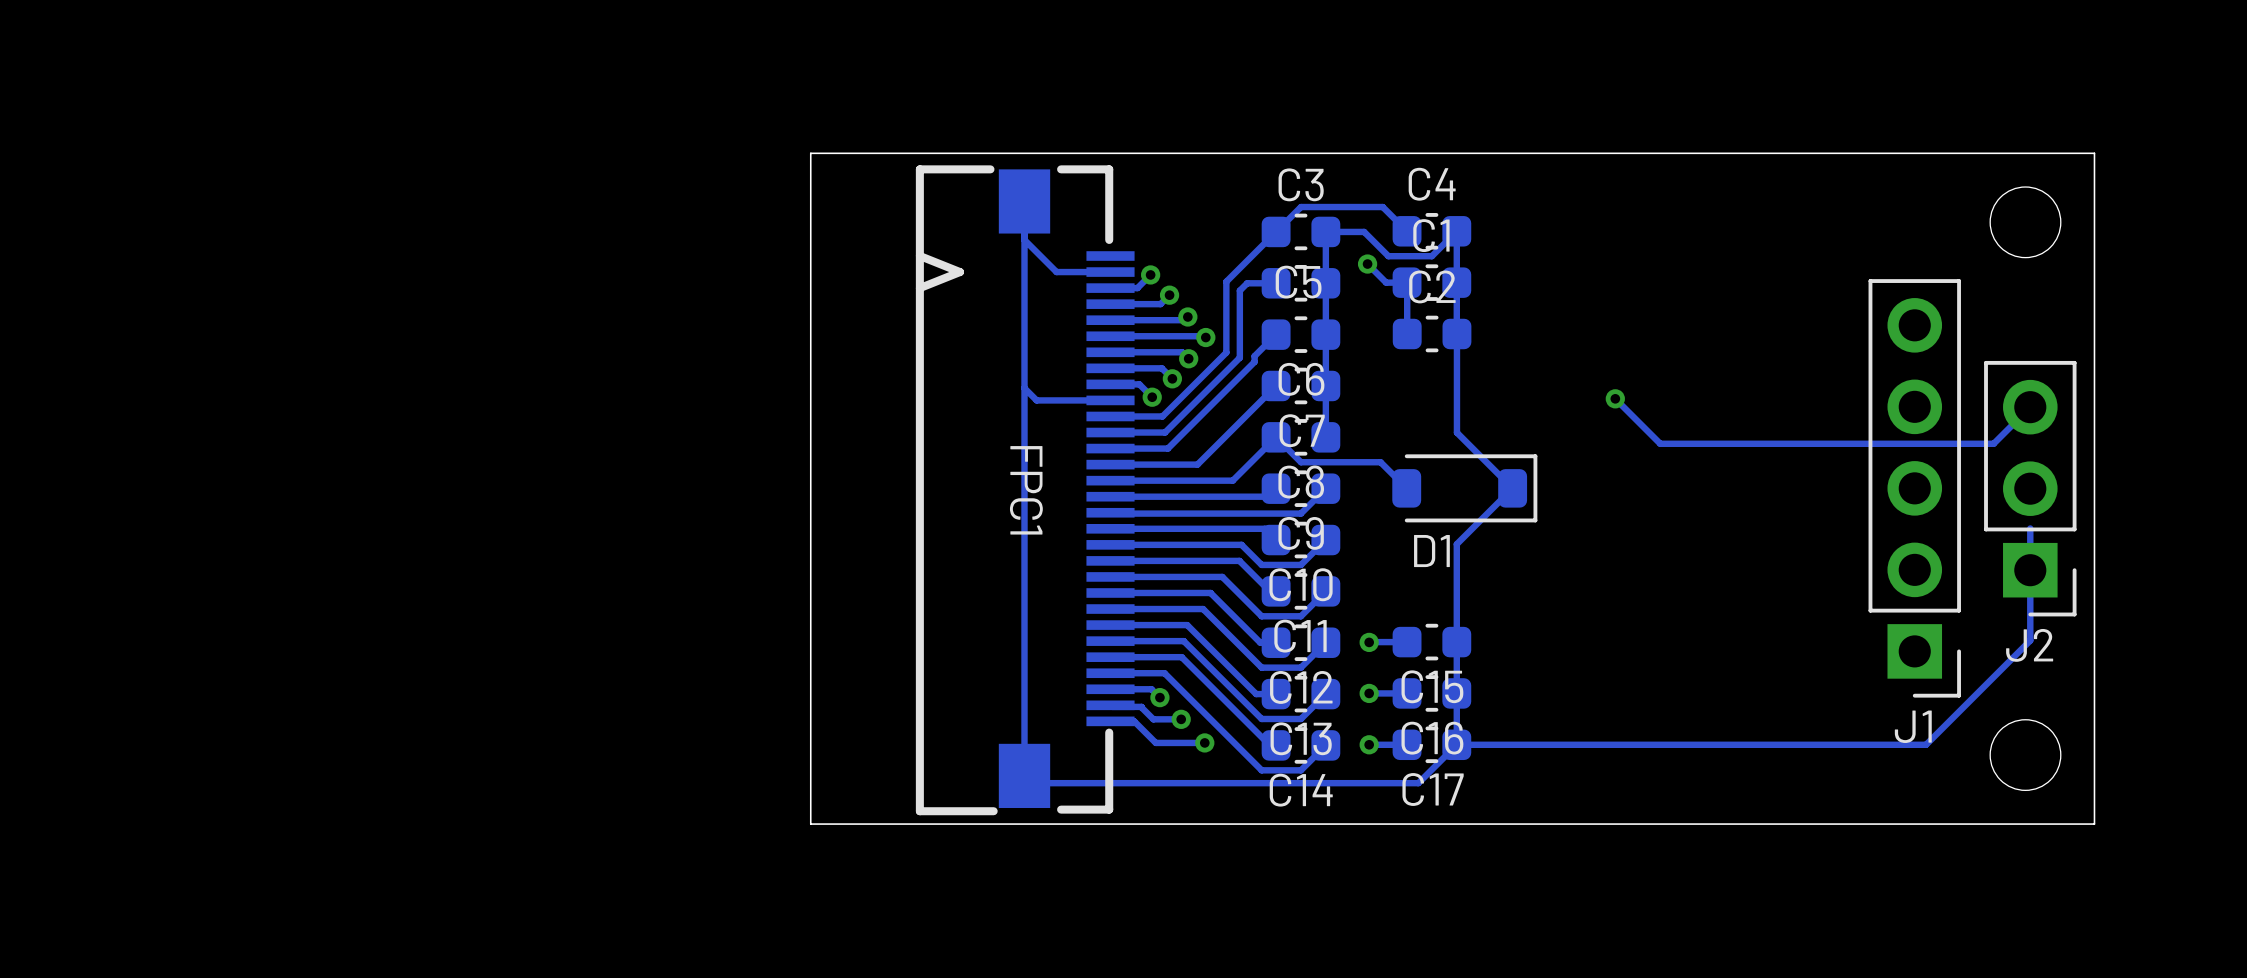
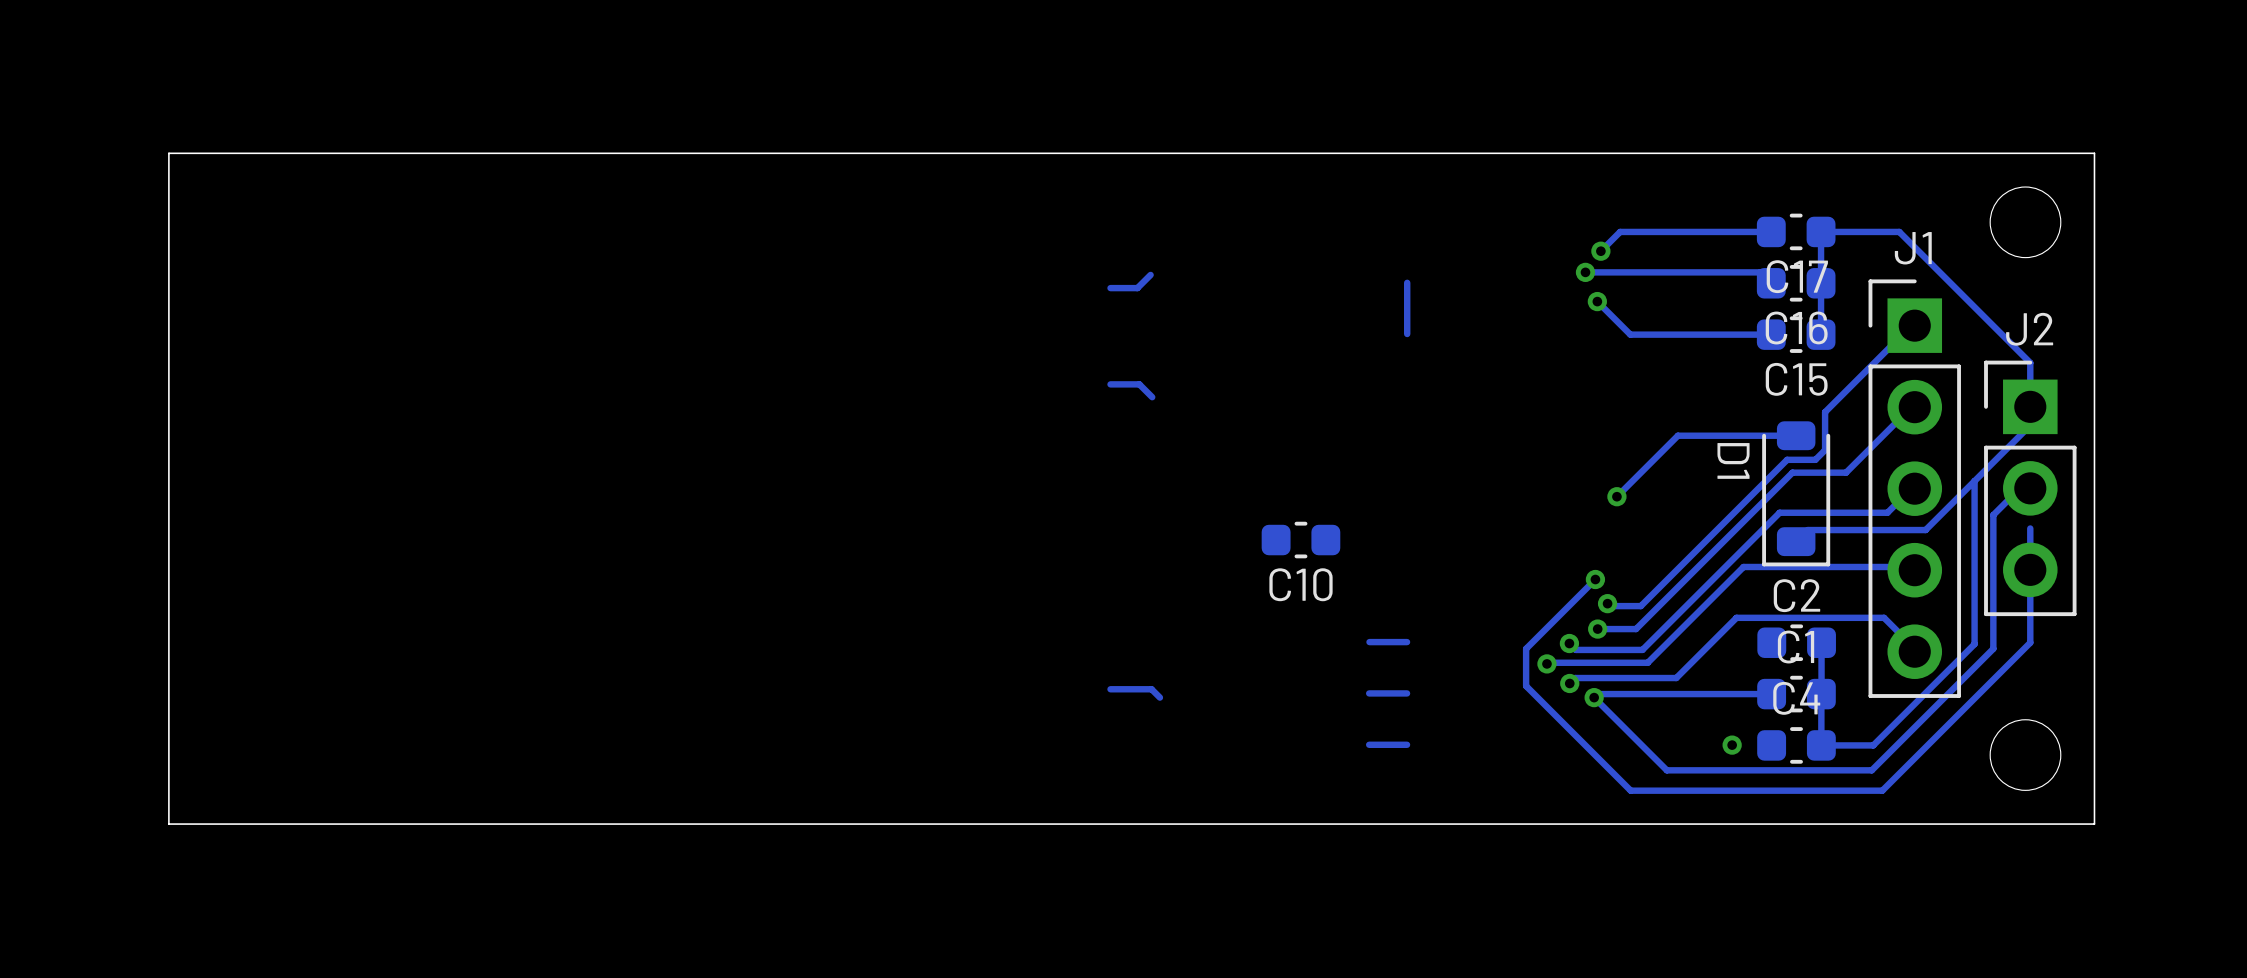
board edge: (810, 153) (810, 824) -> (810, 153) (168, 153) (168, 824) (810, 824)
track: (1024, 201) (1024, 775) (1031, 783) (1418, 783) (1456, 744) -> none
C3: (1300, 231) -> none
track: (1407, 231) (1382, 207) (1301, 207) (1226, 281) (1226, 352) (1162, 416) (1110, 416) -> none
C4 position: (1431, 231) -> (1796, 745)
track: none -> (1771, 231) (1620, 231) (1600, 251)
track: (1024, 239) (1056, 272) (1110, 272) -> none
via: none -> (1600, 251)
track: (1367, 264) (1386, 282) (1407, 282) -> none
via: (1367, 264) -> none
track: none -> (1585, 272) (1760, 272) (1771, 283)
via: none -> (1585, 272)
via: (1150, 274) -> none
C1 position: (1431, 282) -> (1796, 694)
track: (1276, 283) (1247, 283) (1239, 290) (1239, 357) (1165, 432) (1110, 432) -> none
C5: (1300, 283) -> none
track: (1169, 295) (1160, 304) (1110, 304) -> none
via: (1169, 295) -> none
track: none -> (1597, 301) (1630, 334) (1771, 334)
via: none -> (1597, 301)
track: (1187, 316) (1184, 320) (1110, 320) -> none
via: (1187, 316) -> none
track: none -> (1914, 322) (1825, 412) (1825, 450) (1815, 459) (1787, 459) (1640, 606) (1610, 606) (1607, 603)
C2 position: (1432, 333) -> (1796, 642)
track: (1456, 333) (1456, 231) (1431, 256) (1388, 256) (1364, 231) (1325, 231) (1325, 437) -> none
track: (1456, 333) (1456, 432) (1512, 488) (1456, 544) (1456, 744) -> none
track: (1276, 334) (1254, 356) (1254, 361) (1167, 448) (1110, 448) -> none
C6: (1300, 334) -> none
track: (1110, 336) (1205, 337) -> none
via: (1205, 337) -> none
track: none -> (1825, 338) (1821, 334) (1821, 231) (1899, 231) (2030, 362) (2030, 425) (1925, 530) (1807, 530) (1796, 541)
track: (1110, 352) (1182, 352) (1188, 358) -> none
via: (1188, 358) -> none
track: (1110, 368) (1161, 368) (1172, 378) -> none
via: (1172, 378) -> none
track: (1276, 385) (1197, 464) (1110, 464) -> none
C7: (1300, 385) -> none
track: (1024, 388) (1036, 400) (1110, 400) -> none
via: (1152, 397) -> none
track: (1615, 398) (1660, 443) (1993, 443) (2030, 407) -> none
via: (1615, 398) -> none
track: none -> (1914, 403) (1846, 472) (1792, 472) (1636, 629) (1597, 629)
track: none -> (1796, 435) (1677, 435) (1616, 496)
C8: (1300, 437) -> none
track: none -> (2030, 478) (1993, 515) (1993, 648) (1871, 770) (1666, 770) (1594, 697) (1597, 694) (1771, 694) (1771, 695)
track: (1110, 480) (1232, 480) (1276, 437) (1301, 462) (1380, 462) (1406, 488) -> none
track: none -> (1974, 481) (1974, 644) (1873, 745) (1821, 745) (1820, 642)
track: none -> (1914, 485) (1887, 512) (1779, 512) (1642, 649) (1575, 649) (1569, 643)
track: (1276, 488) (1268, 496) (1110, 496) -> none
C9: (1300, 488) -> none
track: (1325, 488) (1300, 513) (1110, 512) -> none
D1 rotation: 0° (1464, 488) -> 90° clockwise (1796, 493)
D1 position: (1464, 488) -> (1796, 493)
J1 rotation: 0° (1914, 488) -> 180° (1914, 488)
J2 rotation: 0° (2030, 488) -> 180° (2030, 488)
FPC1: (1025, 490) -> none
via: none -> (1616, 496)
track: (1110, 528) (1264, 528) (1276, 540) -> none
track: (1325, 540) (1300, 564) (1261, 564) (1241, 544) (1110, 544) -> none
track: (1110, 560) (1239, 560) (1269, 591) (1276, 591) -> none
track: none -> (1914, 566) (1743, 566) (1647, 662) (1546, 663)
track: (1110, 576) (1222, 576) (1261, 616) (1300, 616) (1325, 591) -> none
via: none -> (1595, 579)
C11: (1300, 591) -> none
track: (1110, 592) (1210, 592) (1260, 642) (1276, 642) -> none
via: none -> (1607, 603)
track: (1110, 609) (1203, 609) (1261, 667) (1300, 667) (1325, 642) -> none
track: (1110, 625) (1187, 625) (1256, 694) (1276, 694) -> none
via: none -> (1597, 629)
track: (2030, 640) (1926, 744) (1456, 744) -> (2030, 640) (2030, 642) (1882, 790) (1630, 790) (1526, 686) (1526, 648) (1595, 579)
track: (1110, 641) (1183, 641) (1261, 718) (1300, 718) (1325, 694) -> none
C12: (1300, 642) -> none
via: (1369, 642) -> none
C15 position: (1431, 642) -> (1796, 334)
via: none -> (1569, 643)
track: none -> (1914, 648) (1884, 617) (1736, 617) (1676, 678) (1575, 678) (1569, 683)
track: (1110, 657) (1181, 657) (1269, 745) (1276, 745) -> none
via: none -> (1546, 663)
track: (1110, 673) (1164, 673) (1261, 770) (1300, 770) (1325, 745) -> none
via: none -> (1569, 683)
via: (1369, 693) -> none
C16 position: (1431, 693) -> (1796, 283)
C13: (1300, 694) -> none
via: (1159, 697) -> none
via: none -> (1594, 697)
track: (1110, 705) (1141, 706) (1153, 719) (1181, 719) -> none
via: (1181, 719) -> none
track: (1110, 721) (1134, 721) (1155, 742) (1204, 742) -> none
via: (1204, 742) -> none
via: (1369, 744) -> none
C17 position: (1431, 744) -> (1796, 231)
C14: (1300, 745) -> none
via: none -> (1732, 745)

